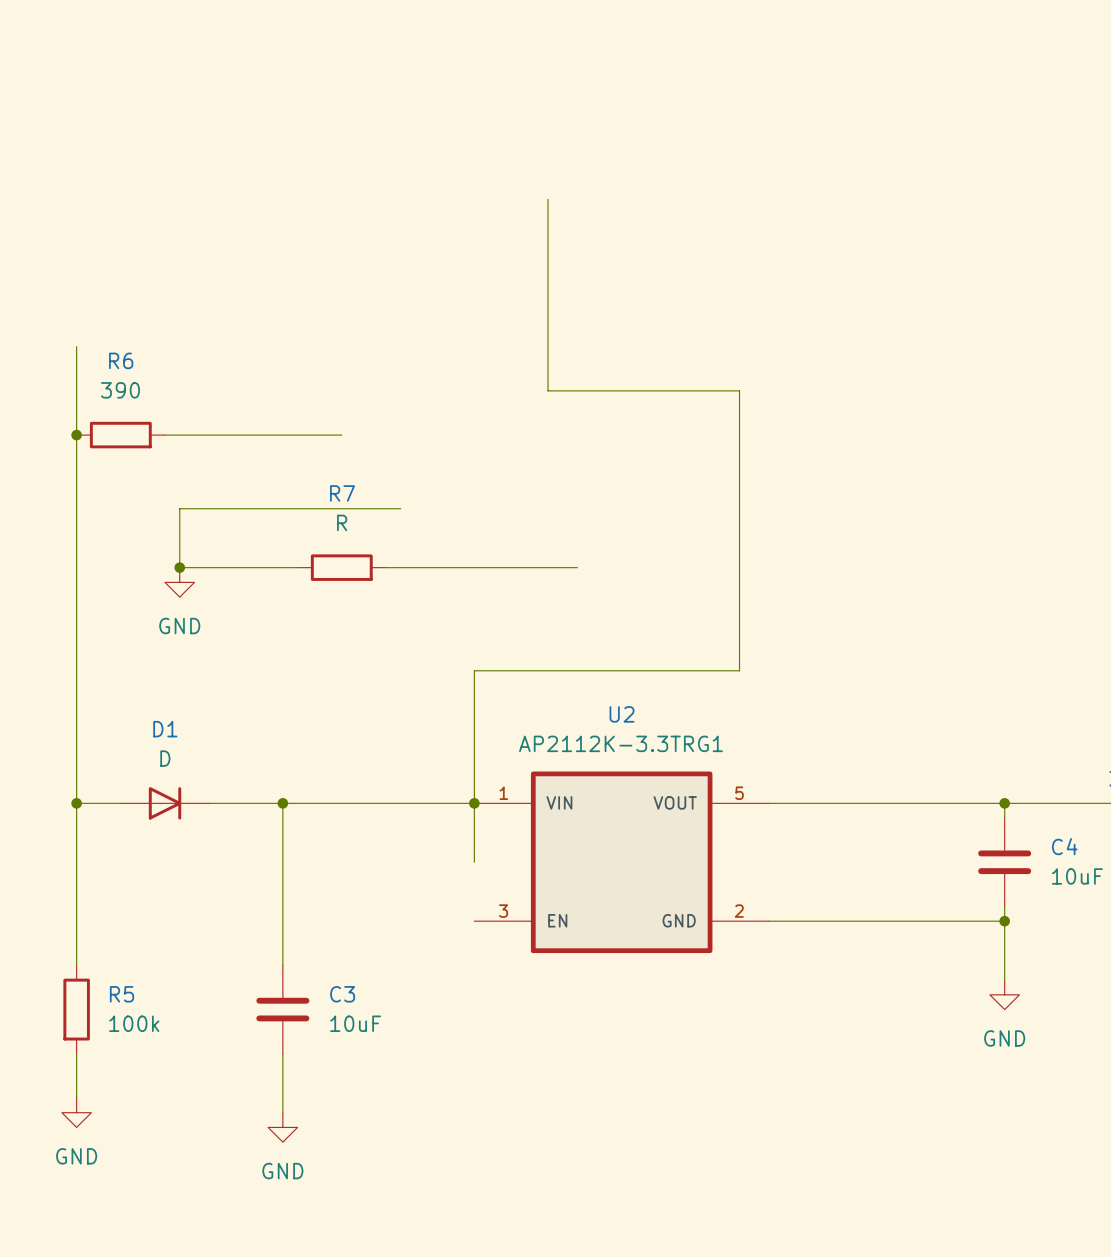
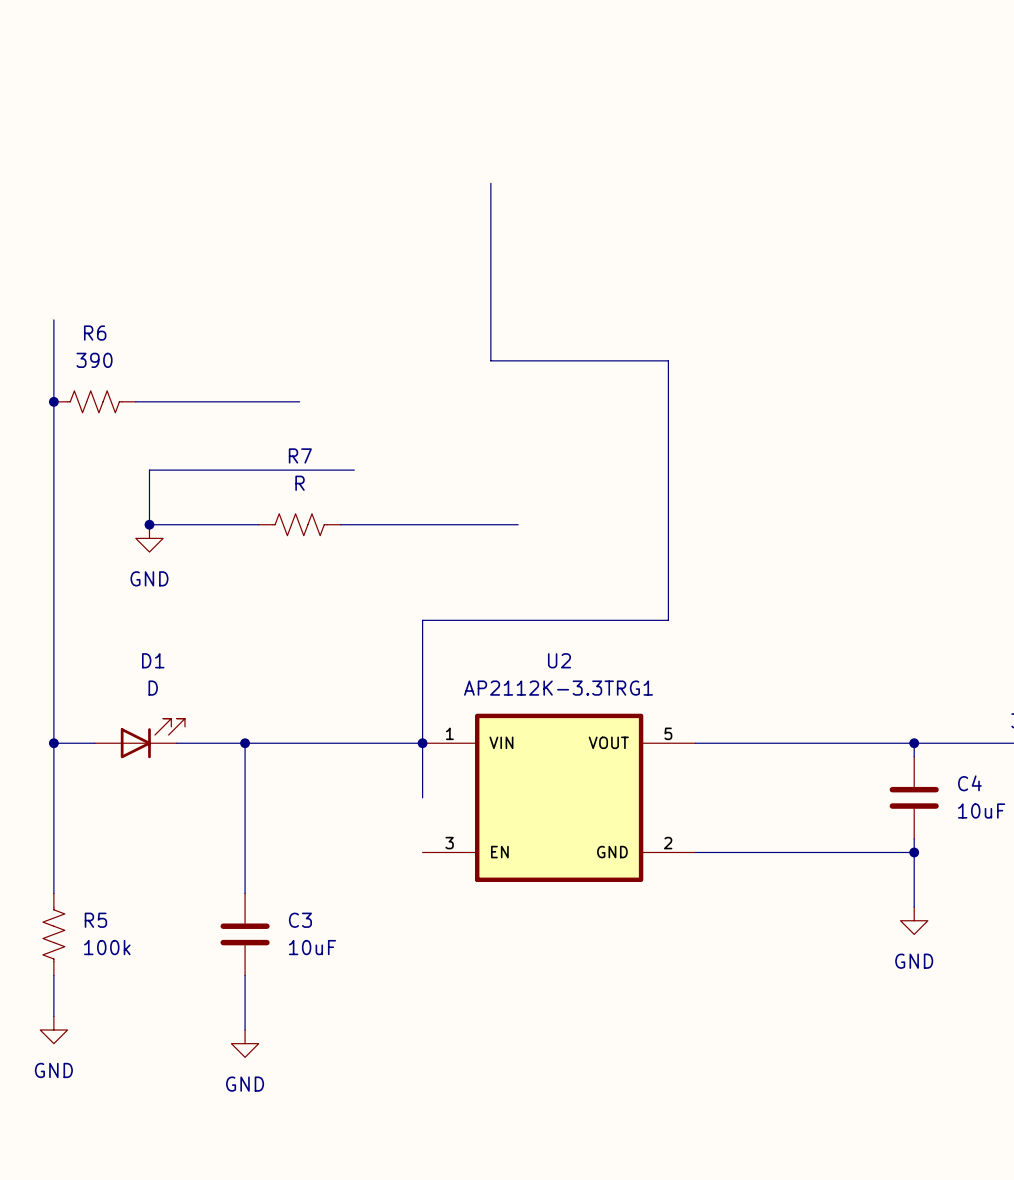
R6 symbol: [76, 421, 166, 449] -> [53, 390, 136, 413]
R7 symbol: [297, 554, 386, 581] -> [258, 513, 341, 536]
D1 symbol: [120, 787, 210, 820] -> [94, 718, 185, 759]
R5 symbol: [63, 965, 90, 1054] -> [42, 893, 65, 976]

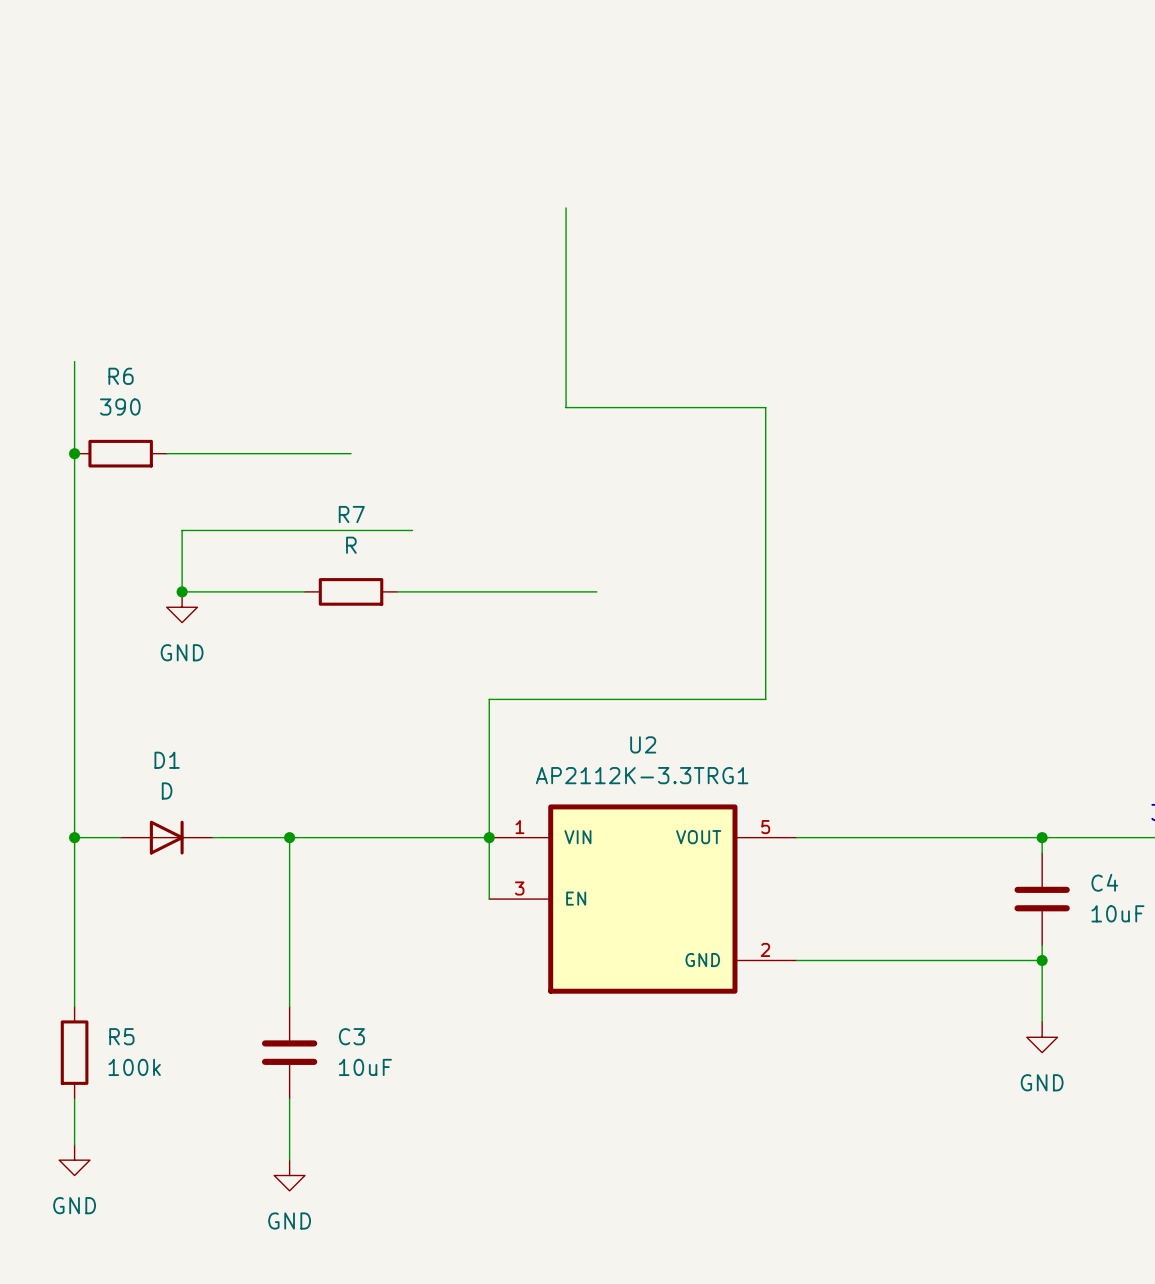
R6 symbol: [53, 390, 136, 413] -> [74, 439, 167, 468]
R7 symbol: [258, 513, 341, 536] -> [304, 578, 398, 606]
U2 symbol: [422, 713, 696, 882] -> [489, 804, 797, 994]
D1 symbol: [94, 718, 185, 759] -> [120, 820, 213, 855]
R5 symbol: [42, 893, 65, 976] -> [60, 1006, 89, 1099]

